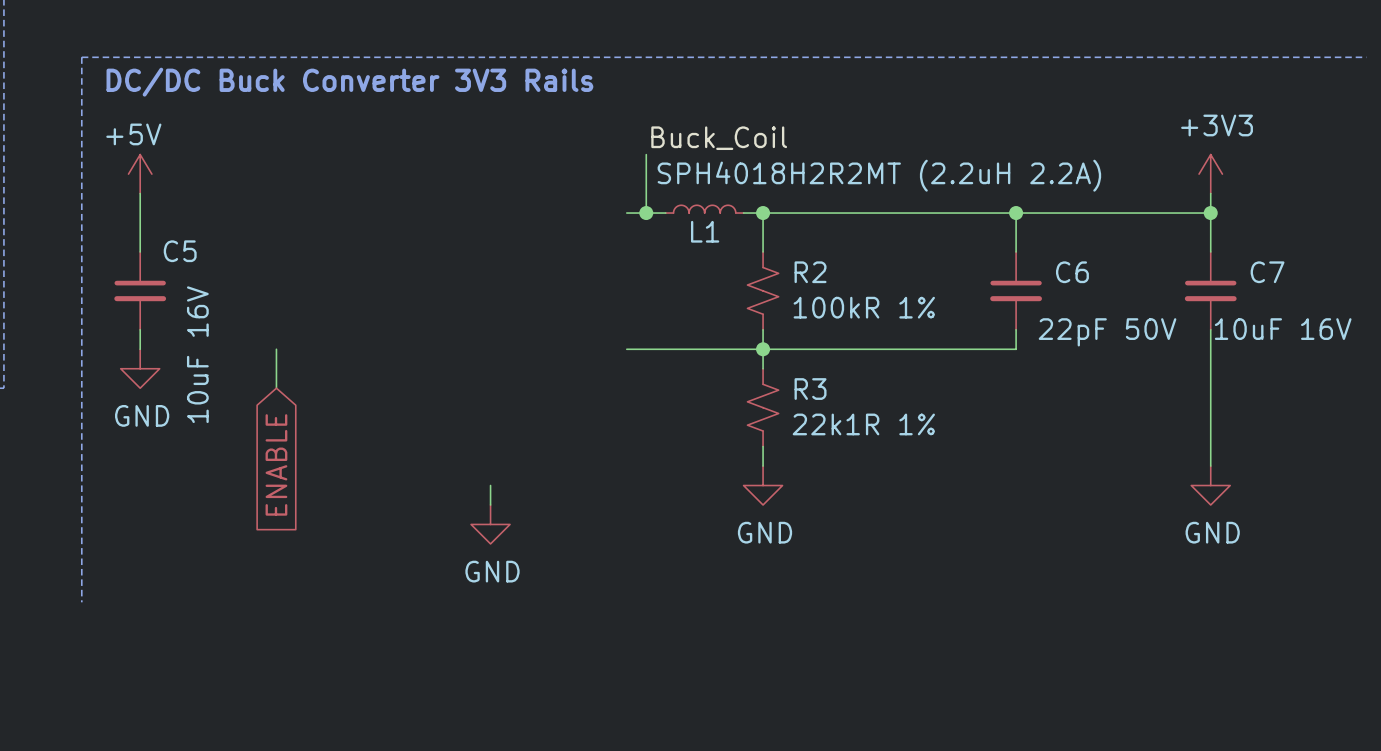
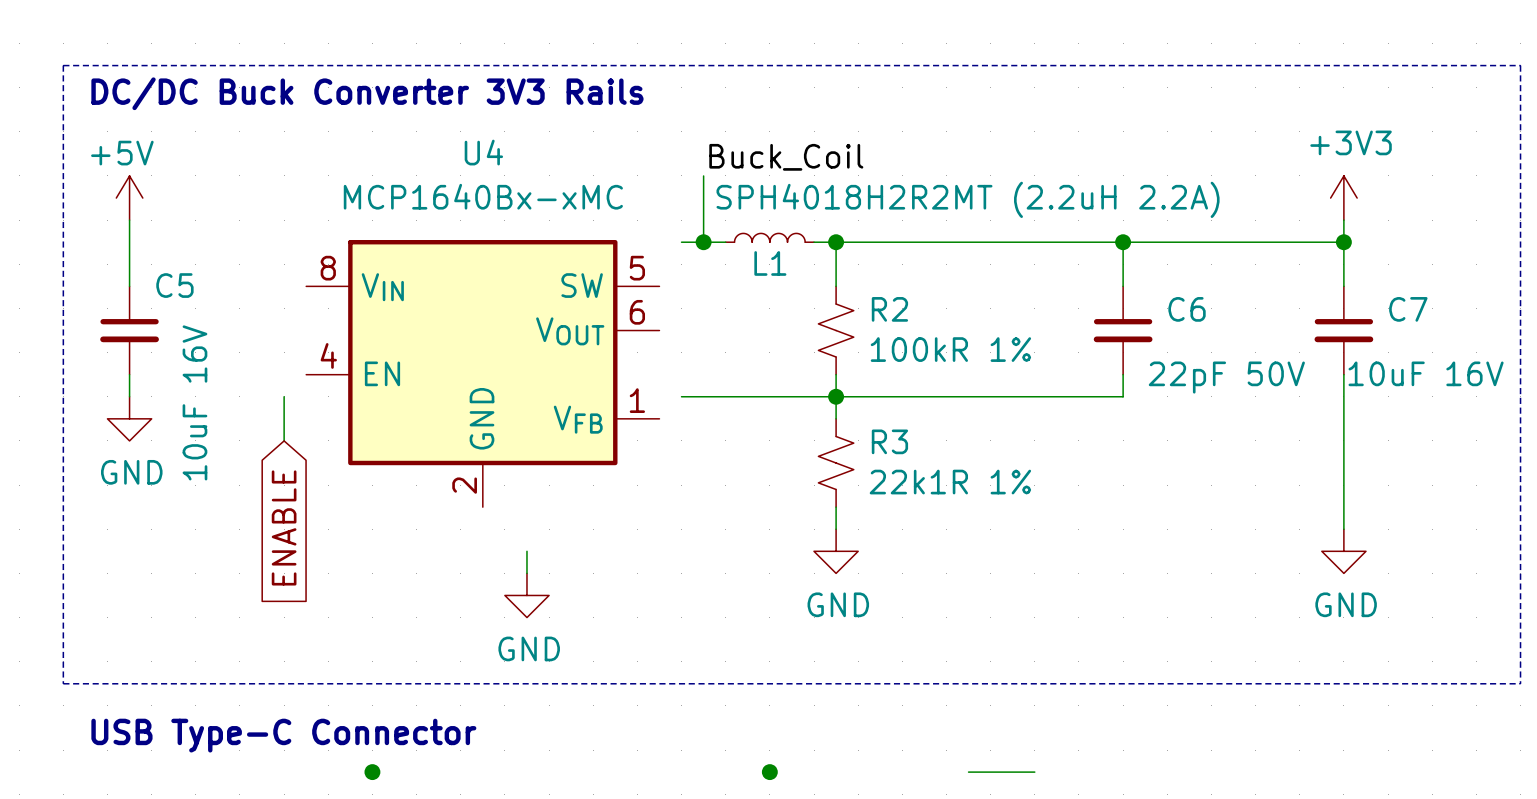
line: none -> (1520, 65) (1520, 683) (63, 683)
U4: none -> MCP1640Bx-xMC (482, 373)
text: none -> USB Type-C Connector (283, 735)
junction: none -> (372, 772)
junction: none -> (769, 772)
wire: none -> (968, 772) (1034, 772)

